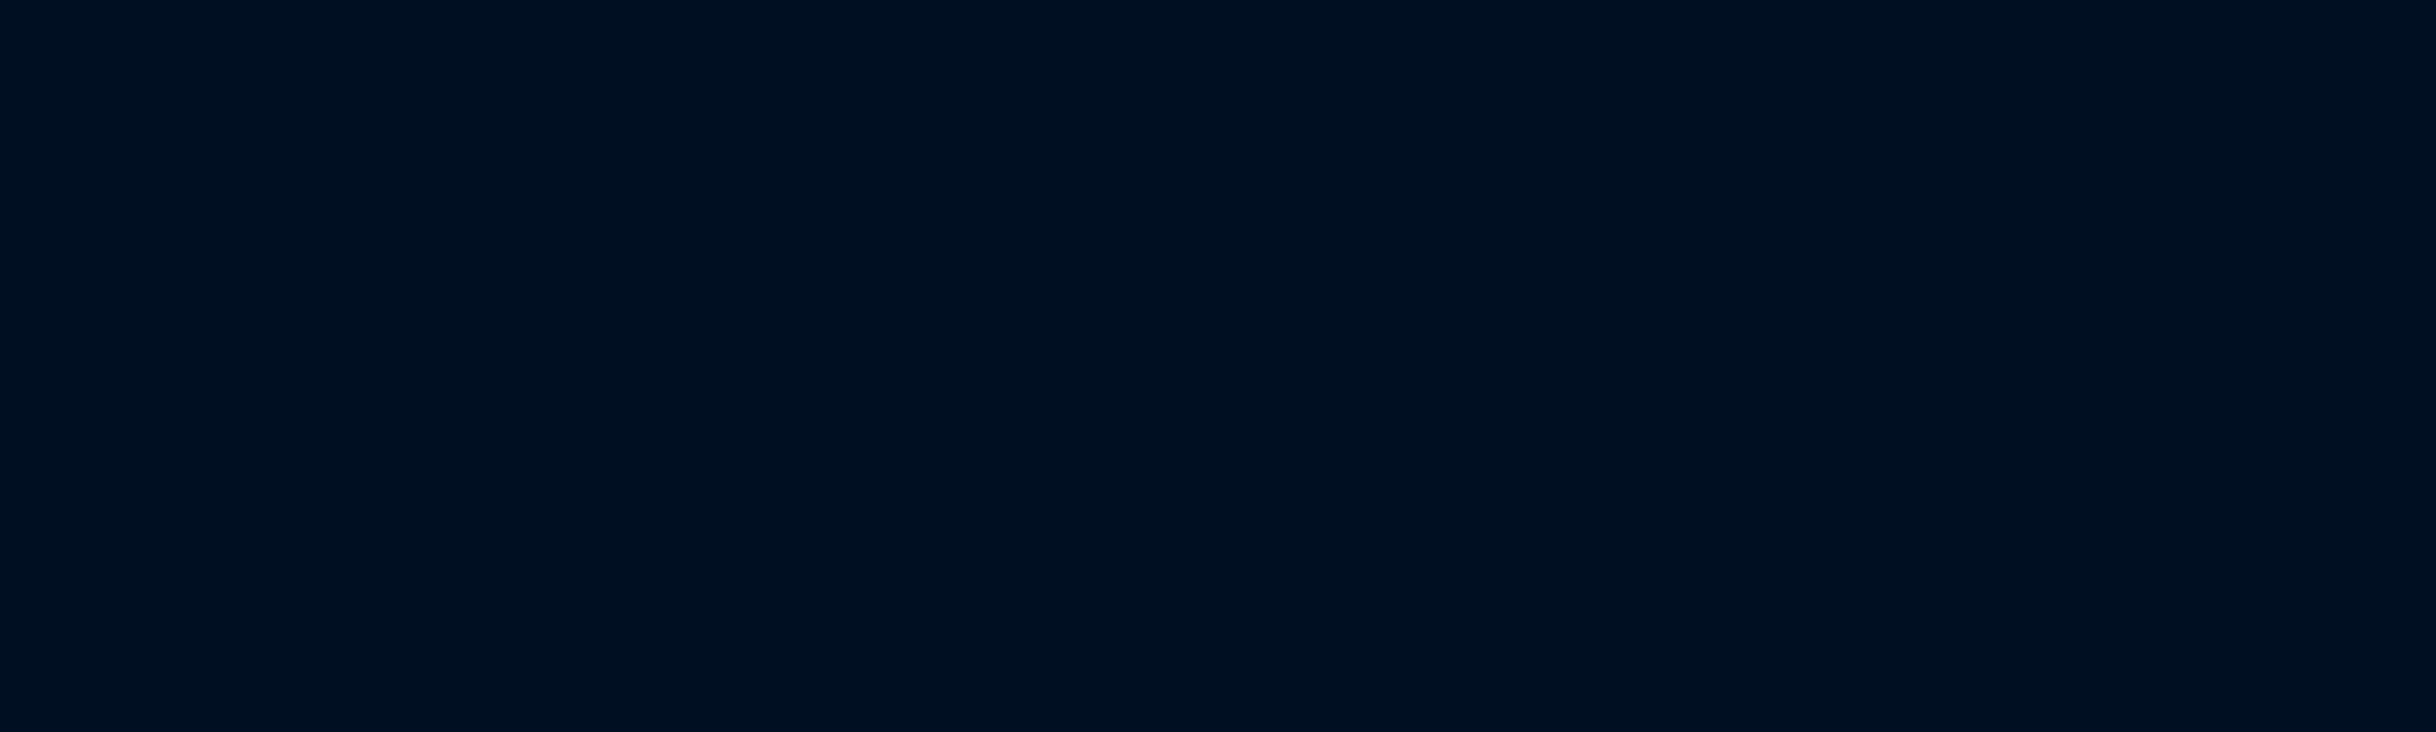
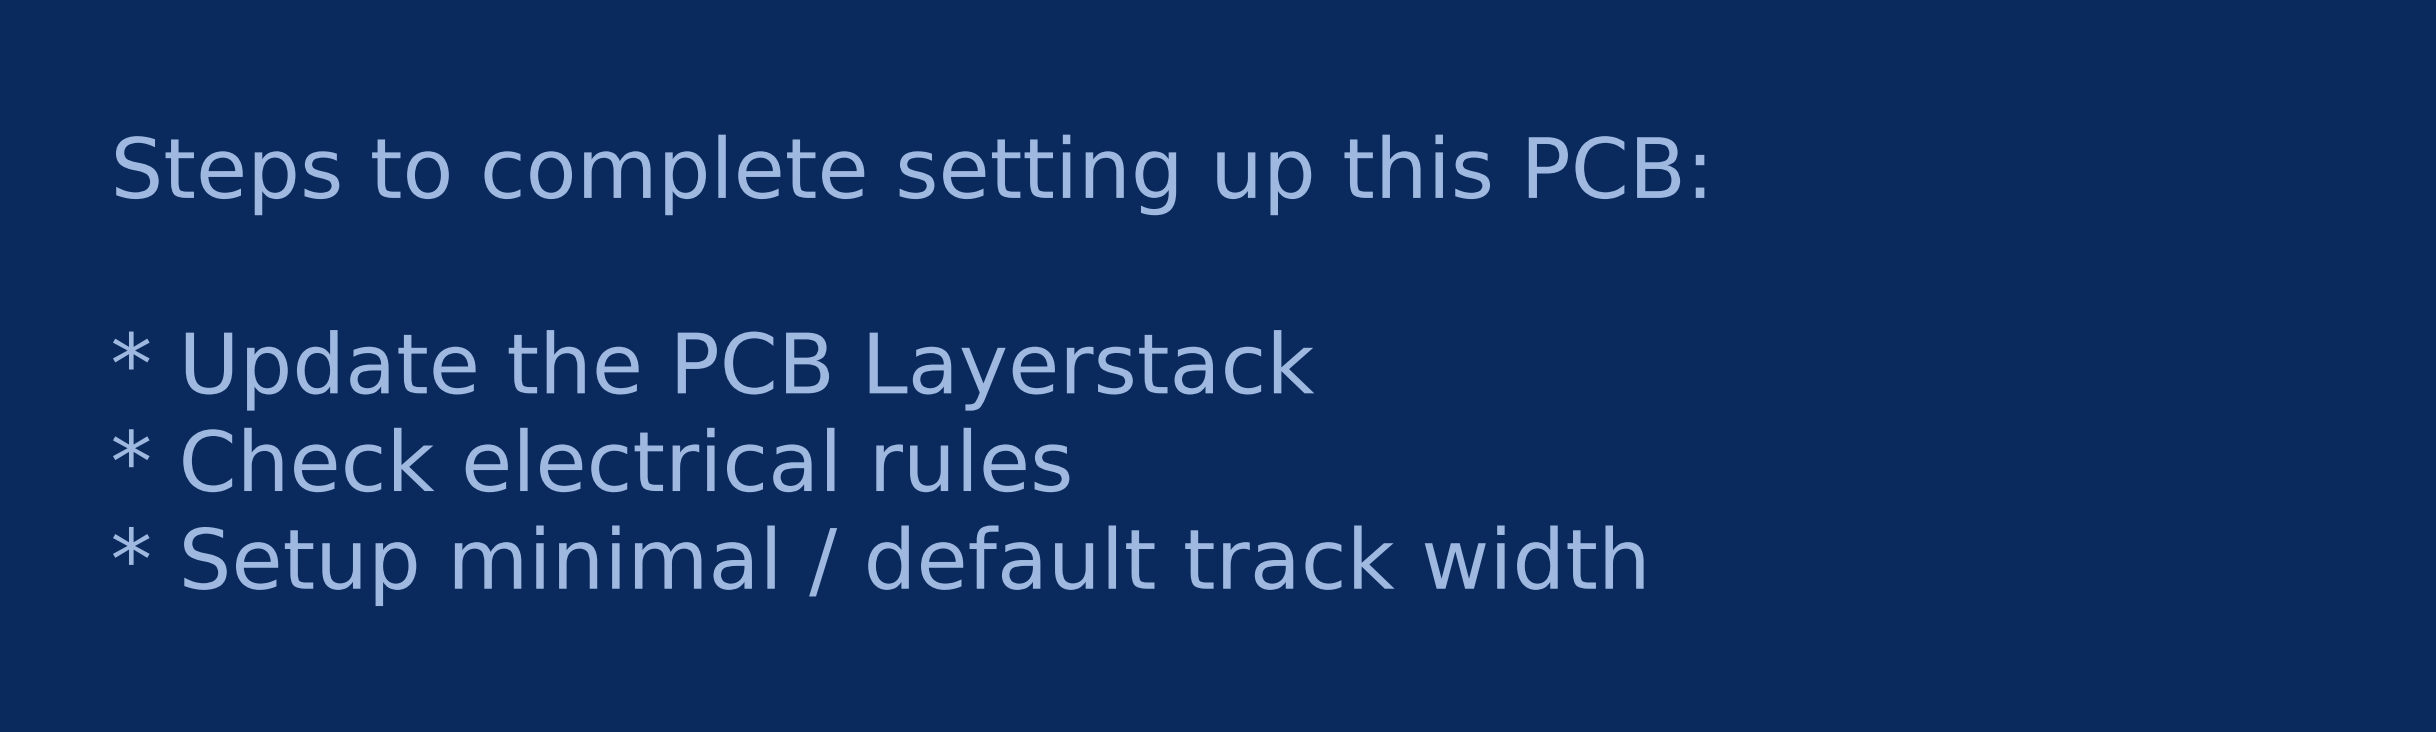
text: none -> Steps to complete setting up this PCB: (910, 174)
text: none -> * Update the PCB Layerstack (713, 370)
text: none -> * Check electrical rules (591, 459)
text: none -> * Setup minimal / default track width (878, 565)

